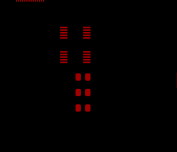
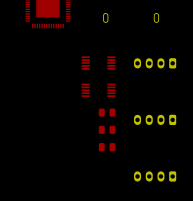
part: none -> (155, 63)
part: none -> (155, 119)
part: none -> (155, 176)

